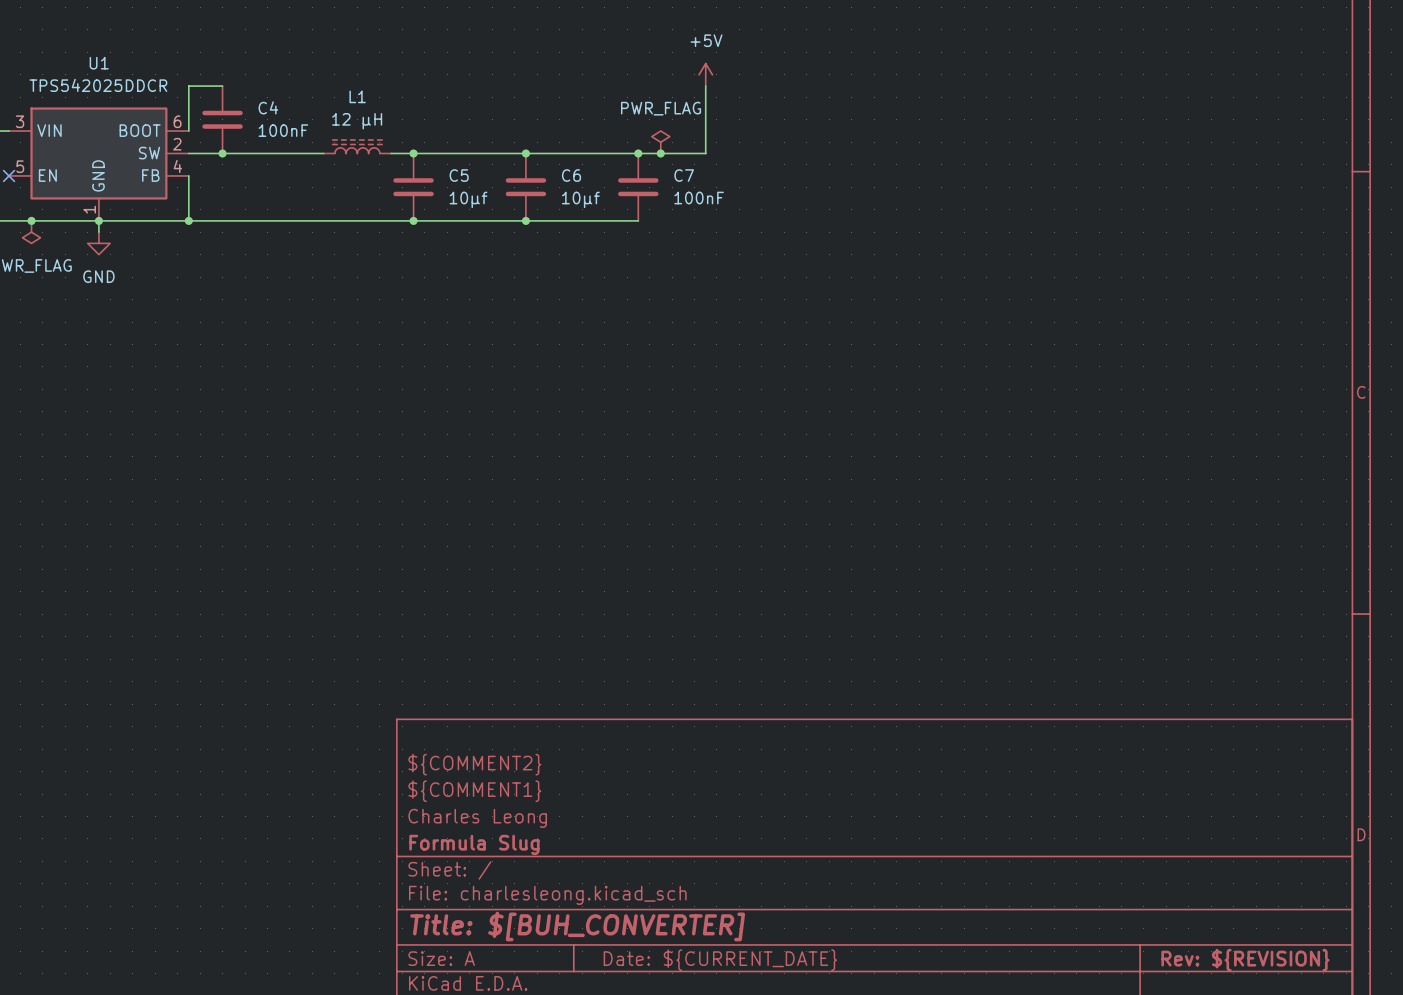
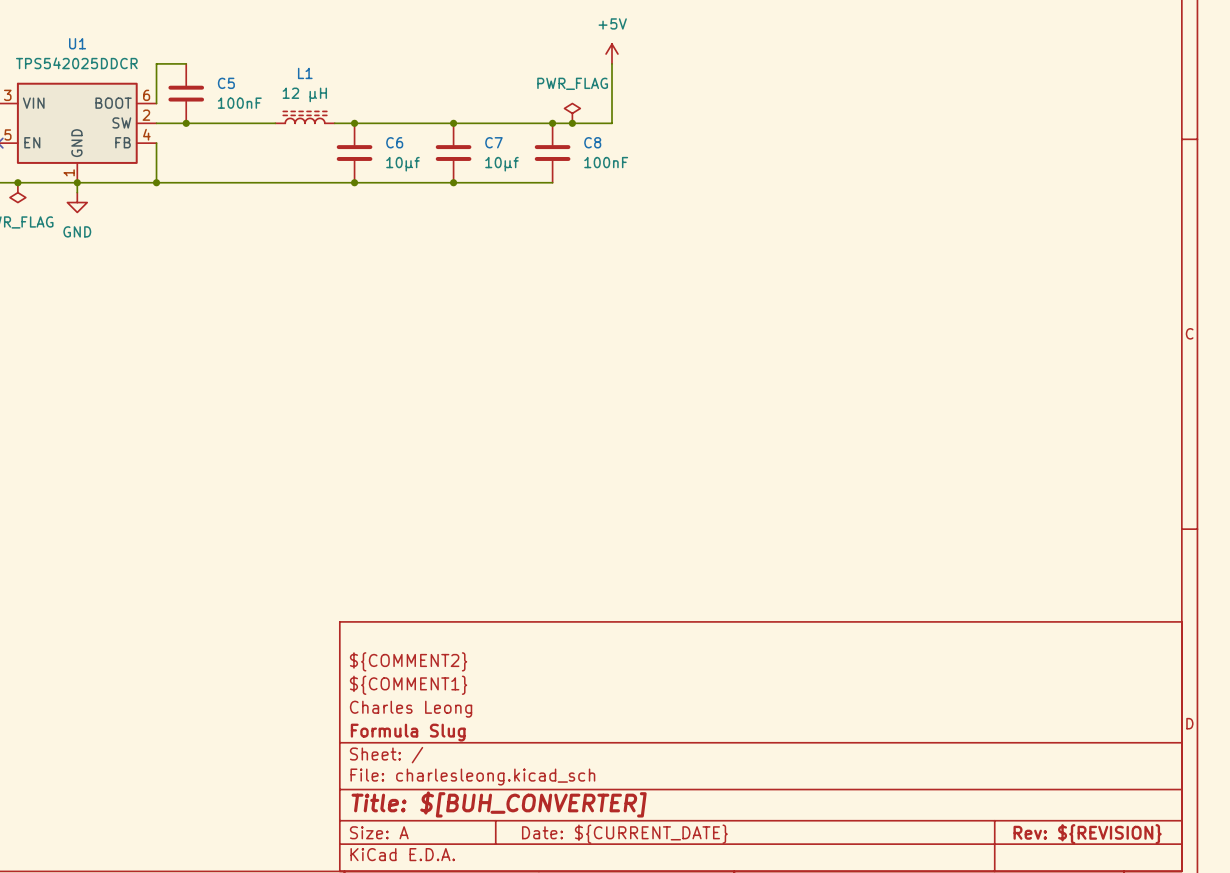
C4 name: C4 (268, 107) -> C5 (226, 83)
C5 name: C5 (459, 175) -> C6 (394, 142)
C6 name: C6 (571, 175) -> C7 (493, 142)
C7 name: C7 (684, 175) -> C8 (592, 142)

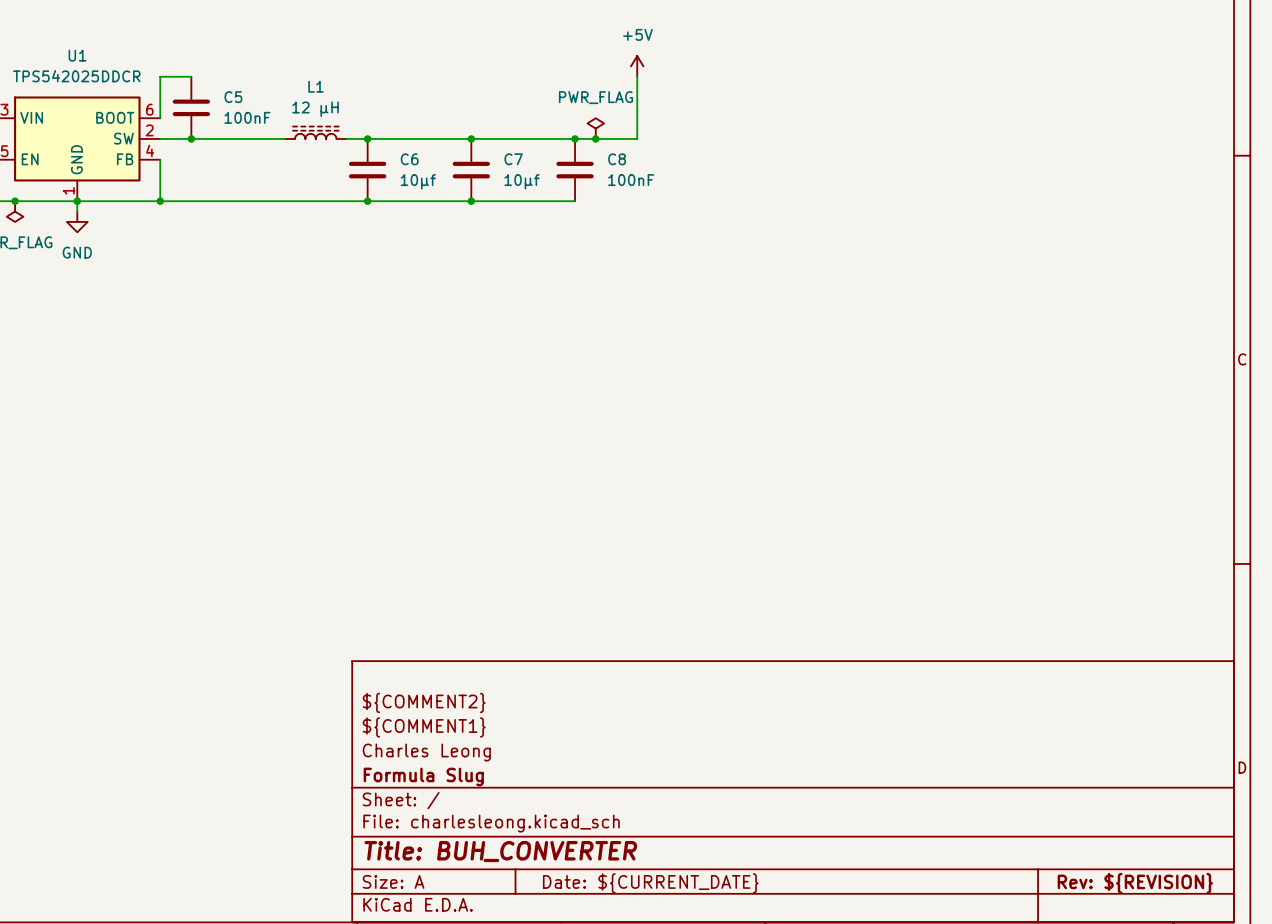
title block: Title: $[BUH_CONVERTER] (499, 804) -> Title: BUH_CONVERTER (500, 851)

